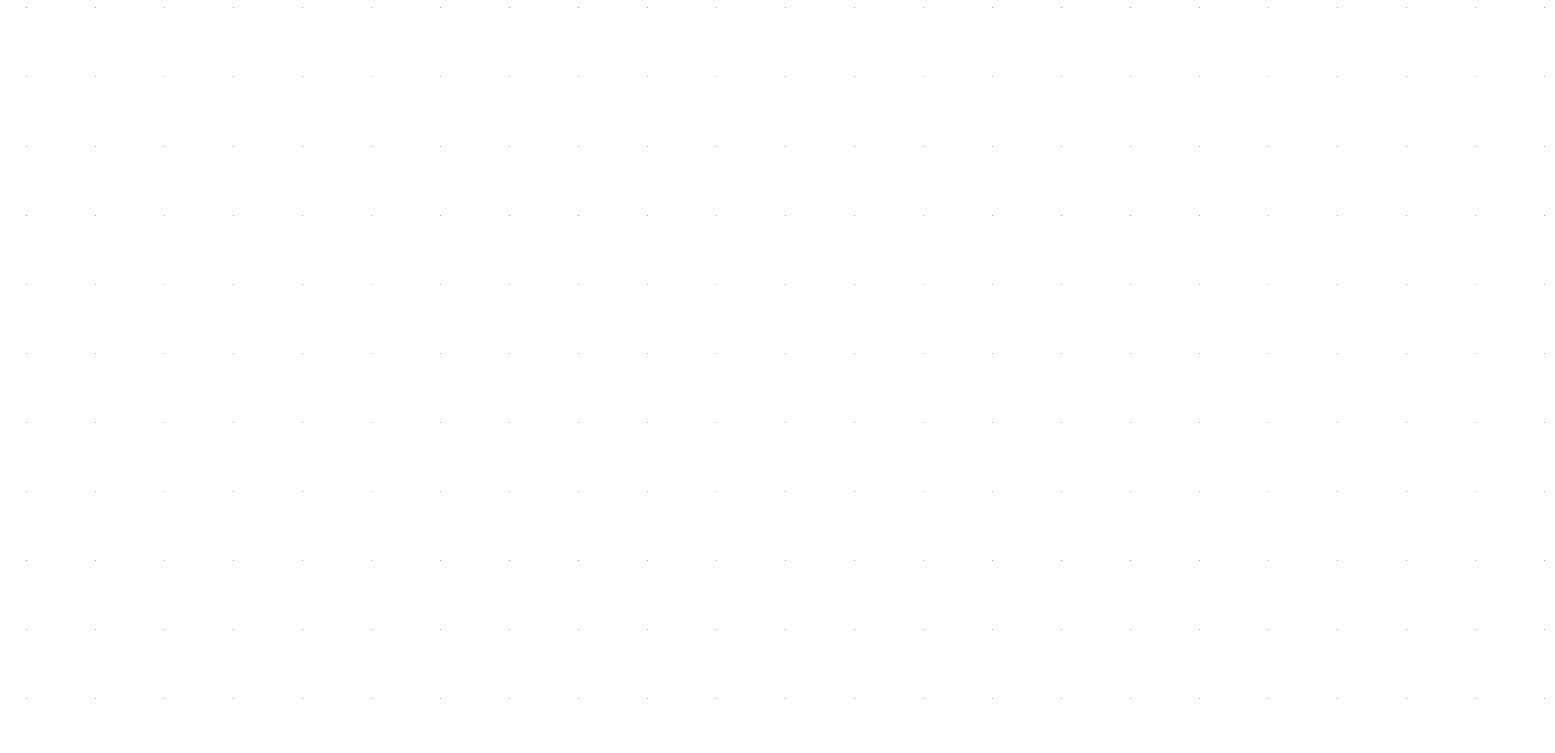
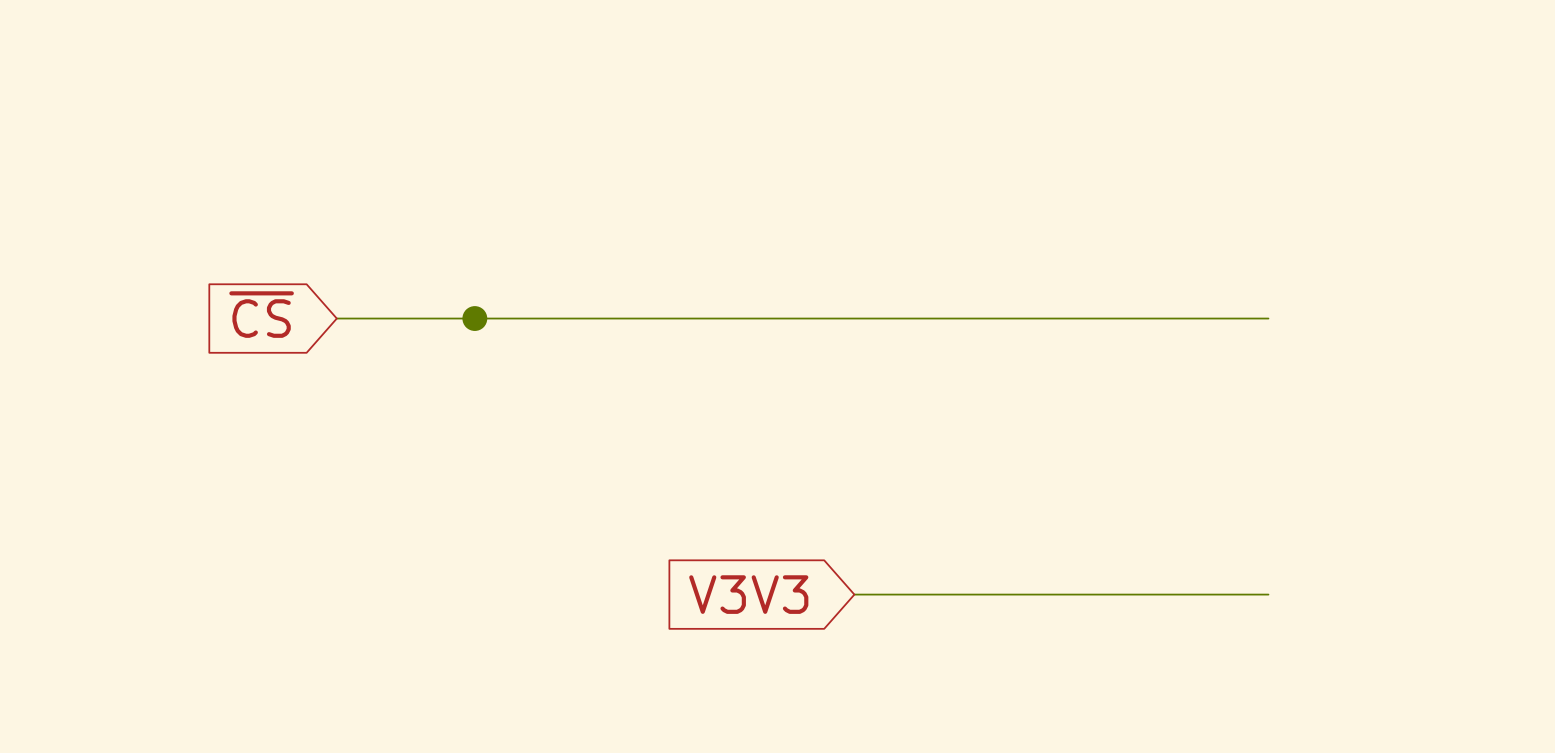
global label: none -> ~{CS} (261, 314)
wire: none -> (336, 318) (1268, 318)
junction: none -> (474, 318)
global label: none -> V3V3 (748, 594)
wire: none -> (854, 594) (1268, 594)

